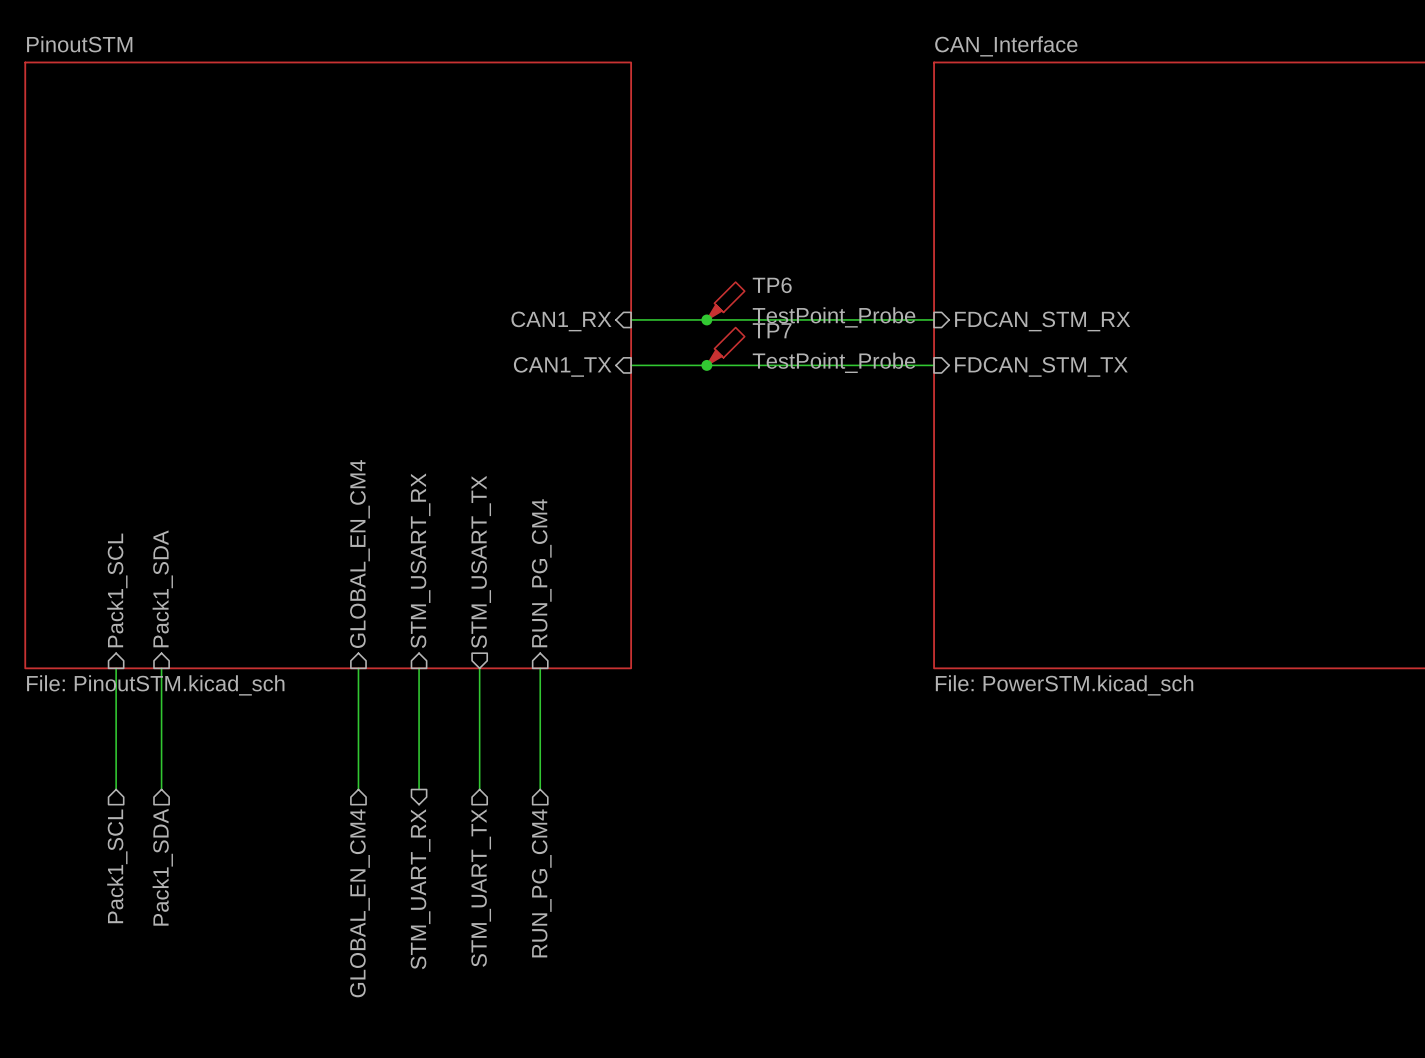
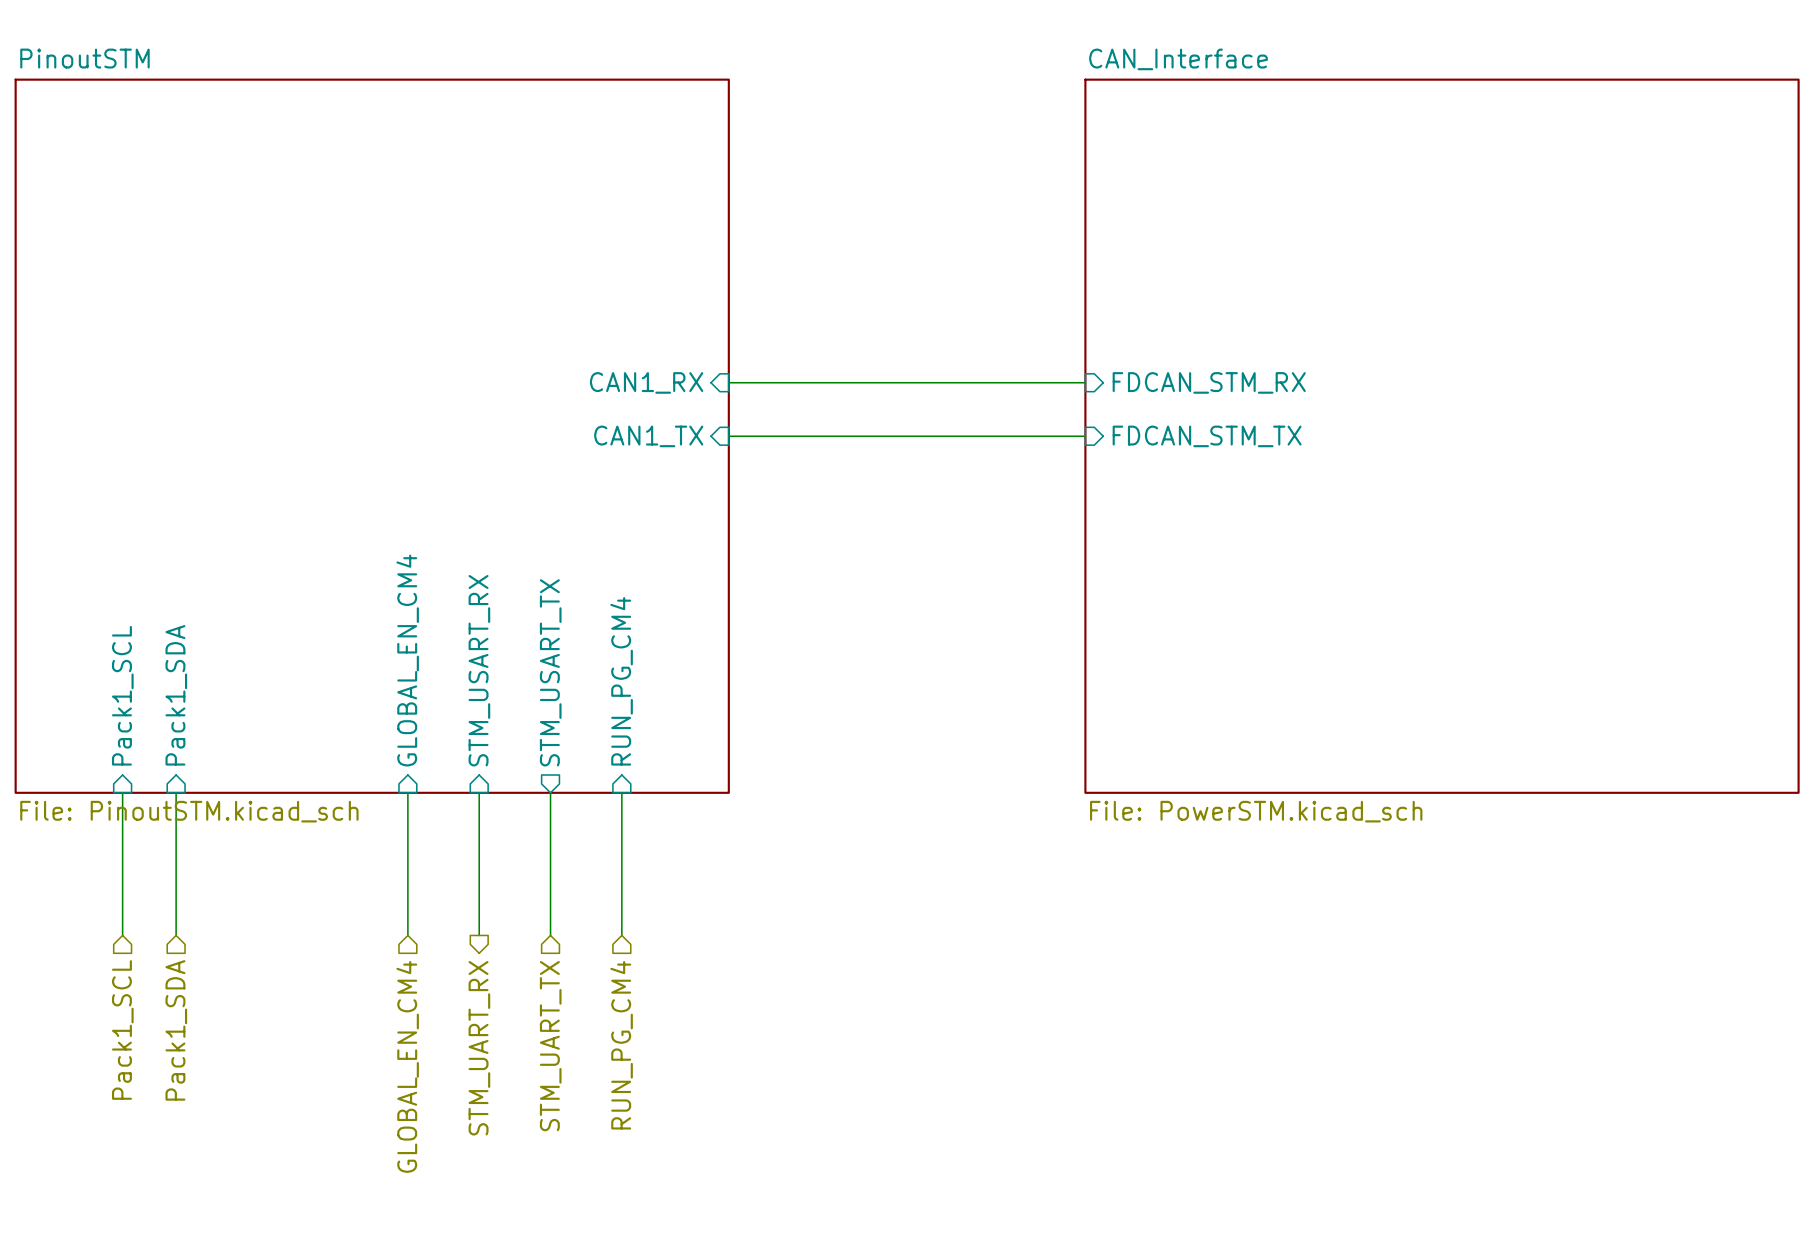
TP6: TestPoint_Probe (725, 301) -> none
junction: (706, 319) -> none
TP7: TestPoint_Probe (725, 346) -> none
junction: (706, 365) -> none

